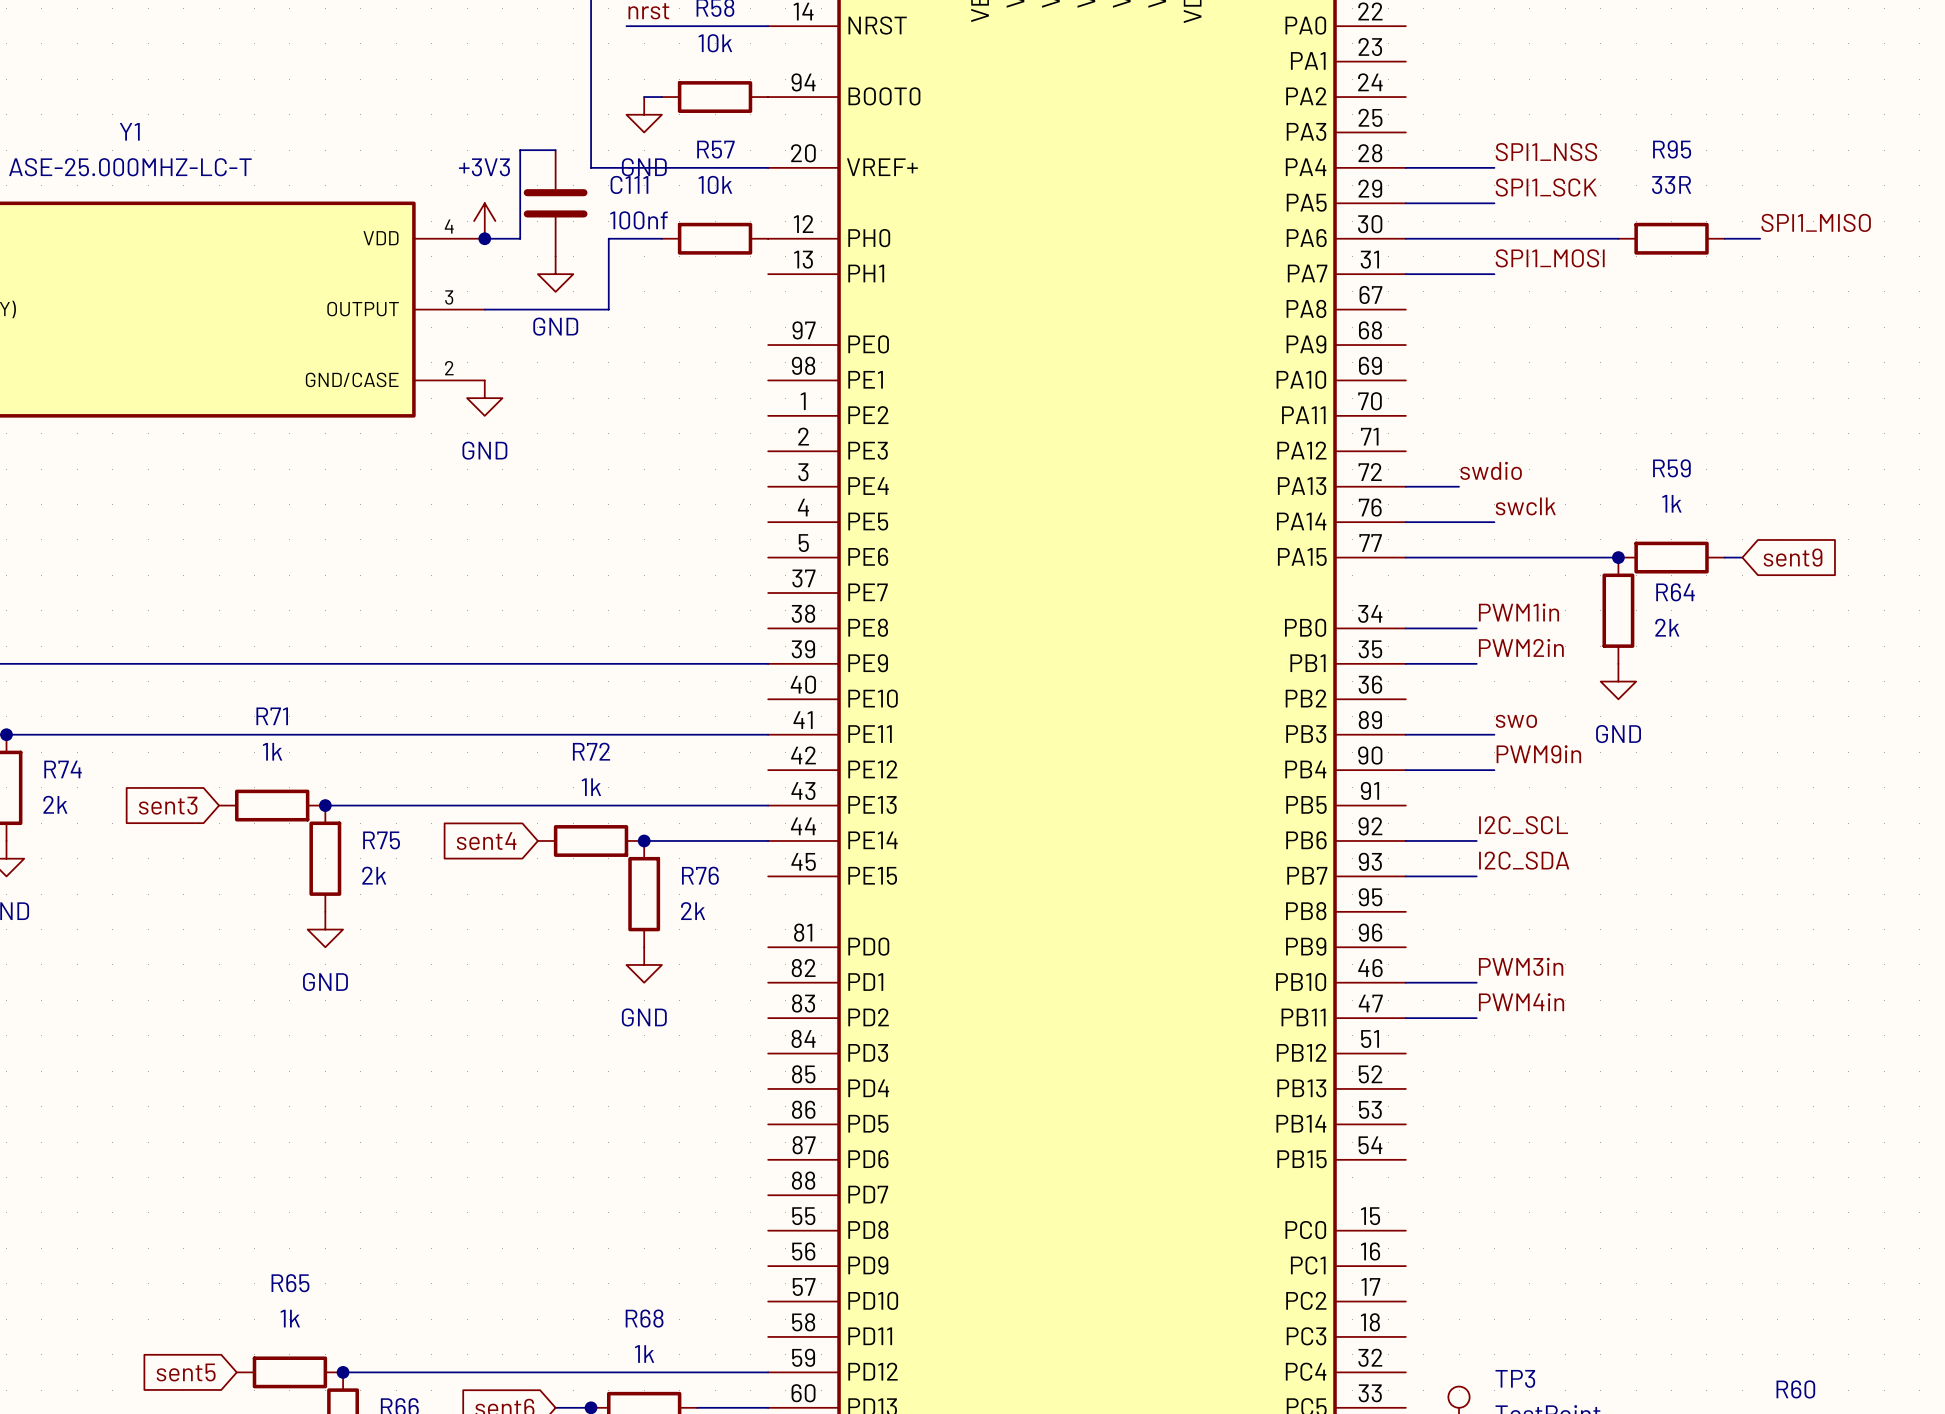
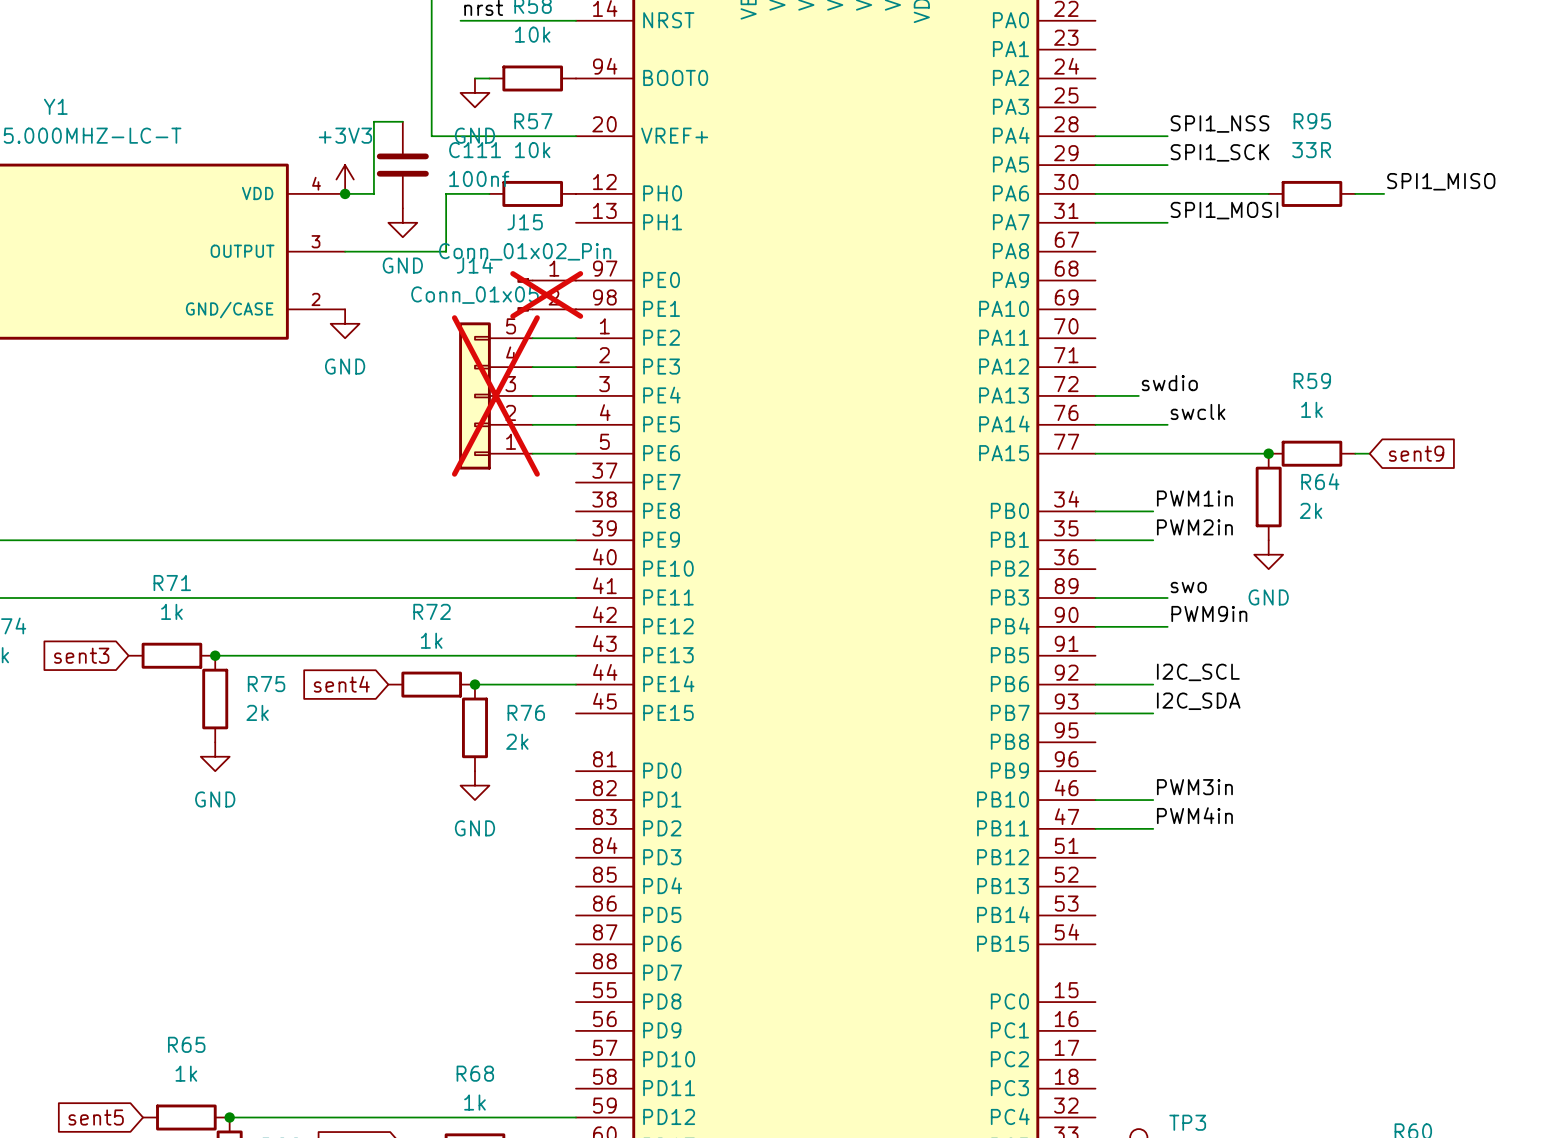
J15: none -> Conn_01x02_Pin (546, 294)
wire: none -> (532, 338) (576, 338)
wire: none -> (532, 367) (576, 367)
J14: none -> Conn_01x05 (495, 395)
wire: none -> (532, 395) (576, 395)
wire: none -> (532, 424) (576, 424)
wire: none -> (532, 453) (576, 453)

